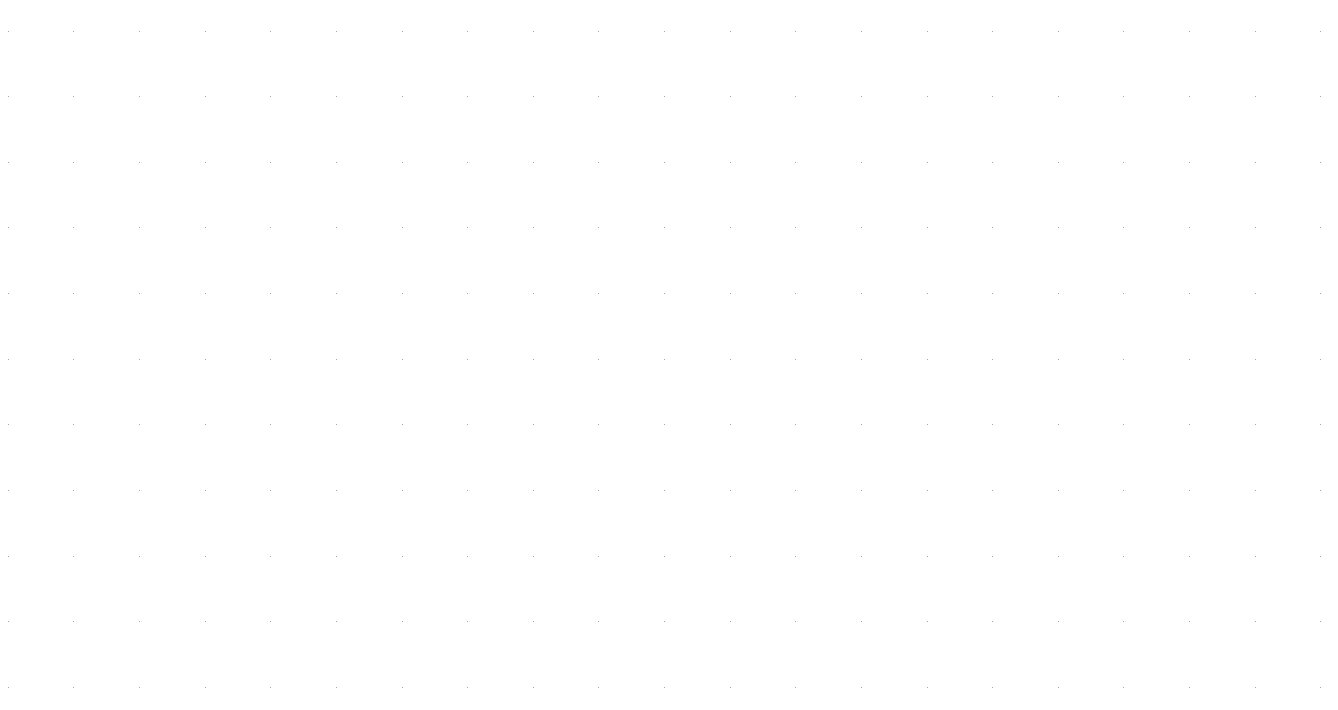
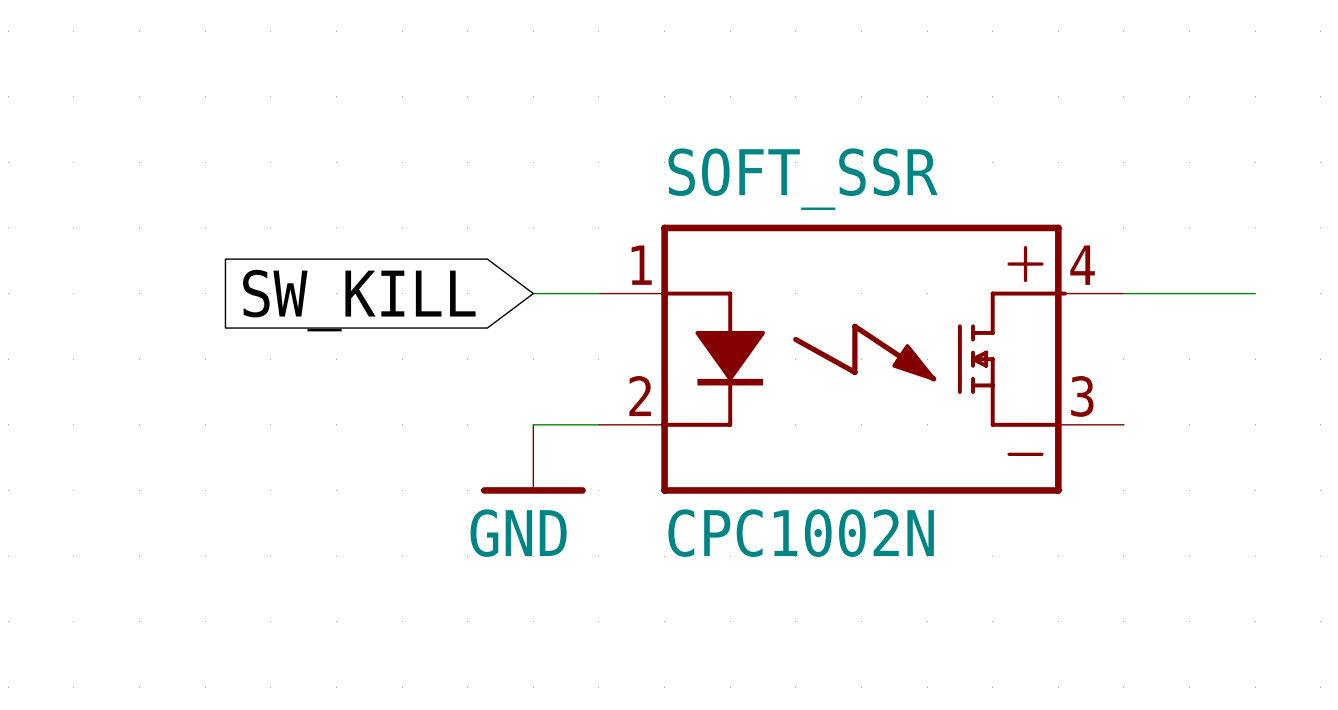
wire: none -> (533, 293) (598, 293)
wire: none -> (1123, 293) (1255, 293)
global label: none -> SW_KILL (359, 300)
SOFT_SSR: none -> CPC1002N (861, 359)
wire: none -> (533, 424) (598, 424)
power symbol: none -> GND (533, 459)

